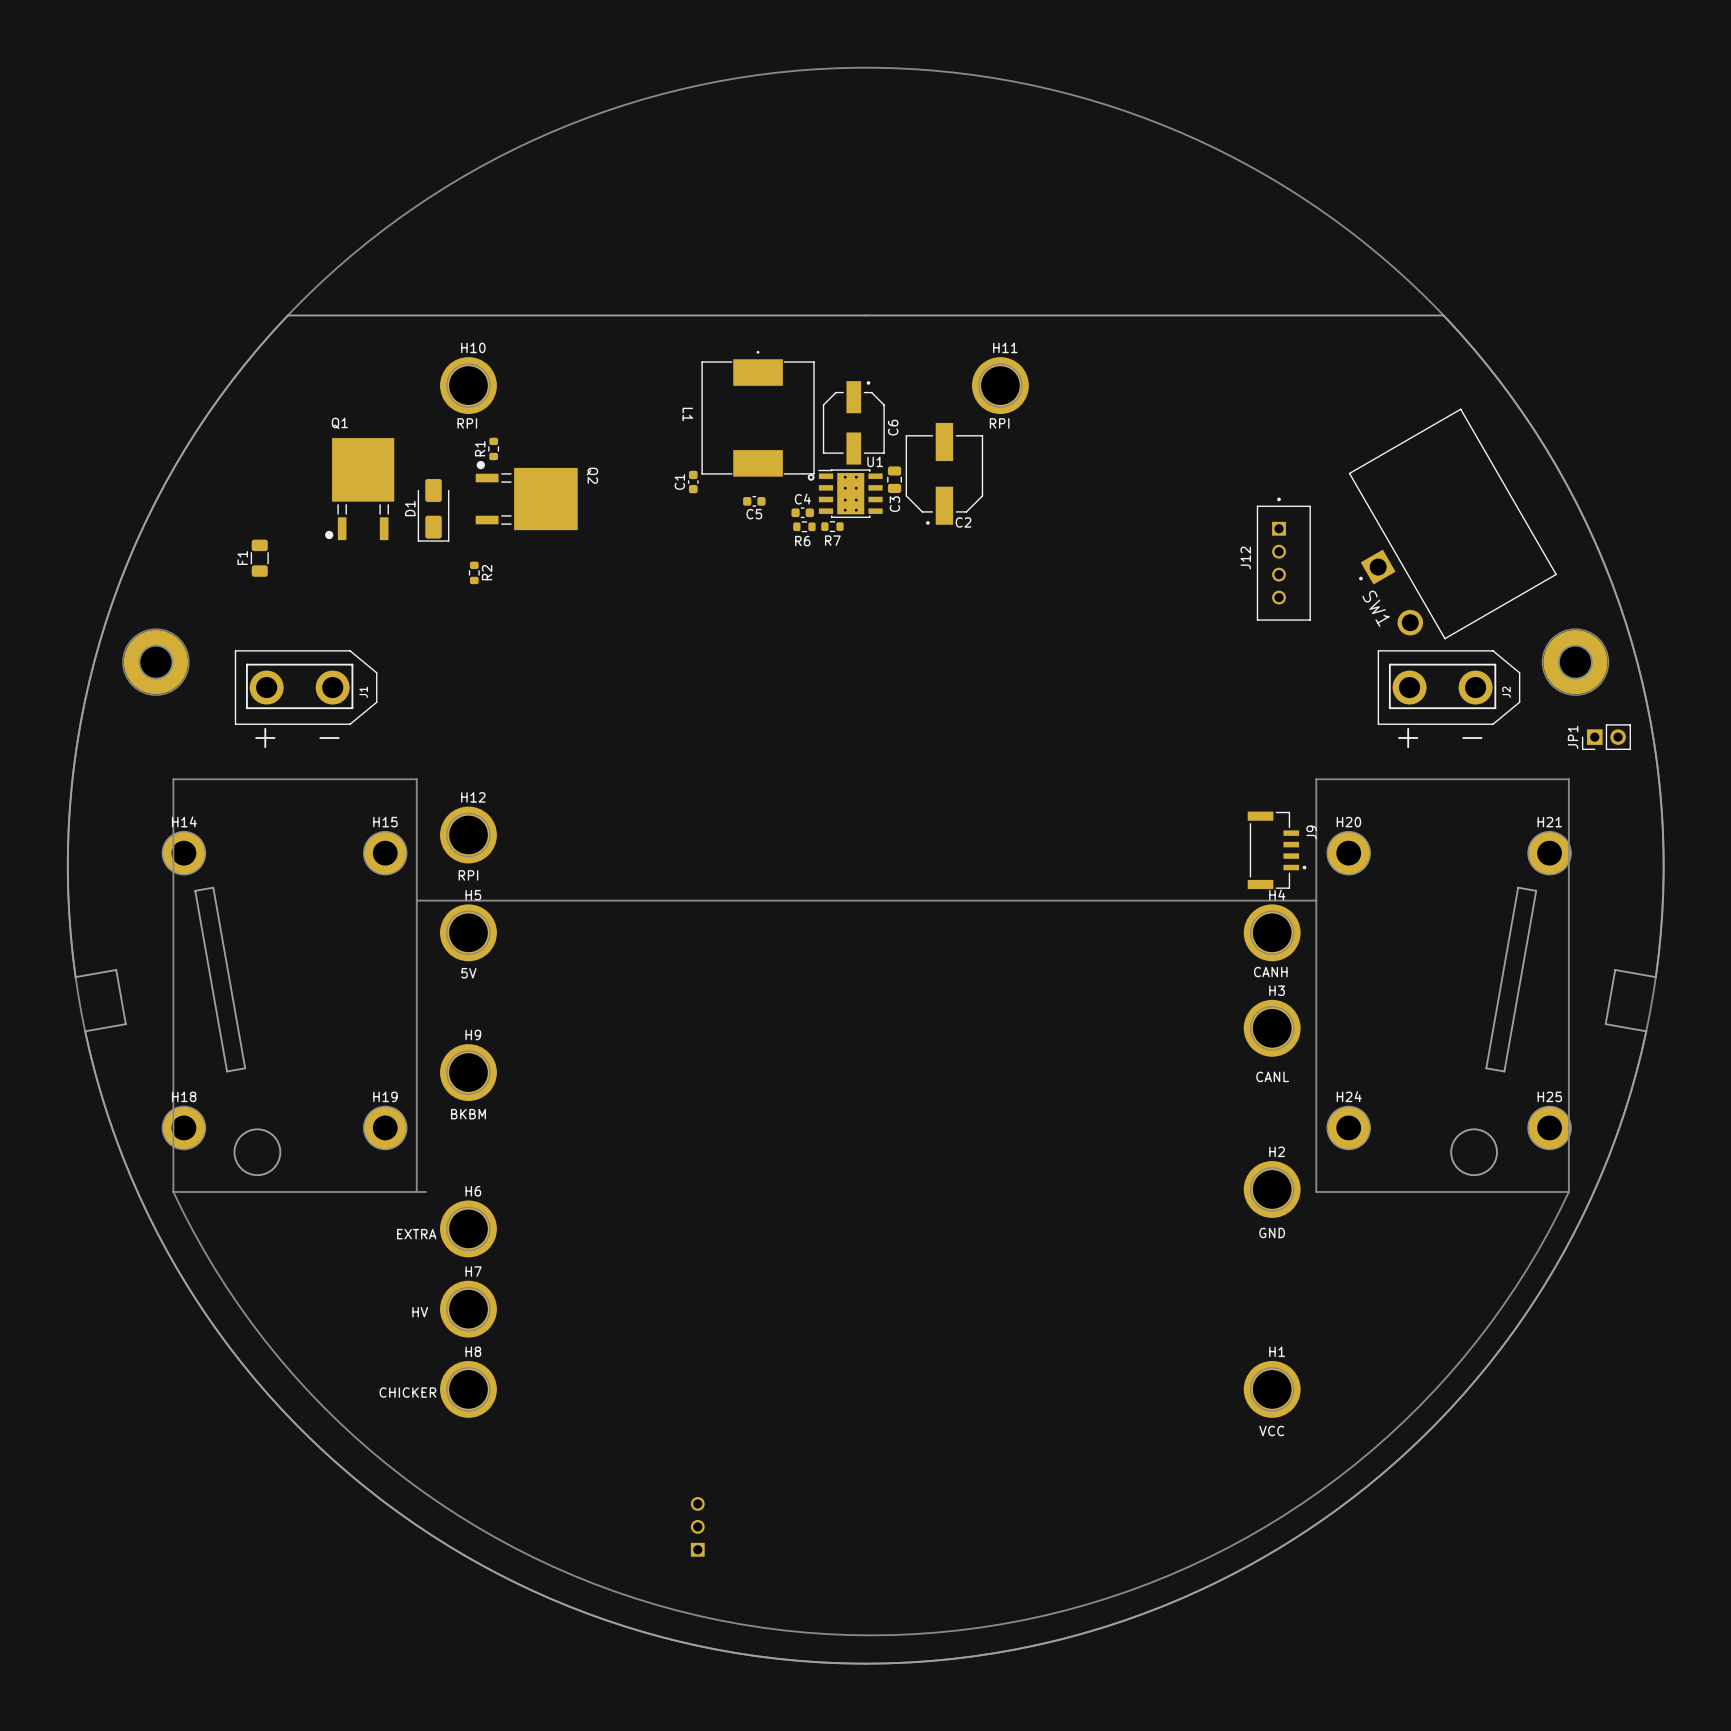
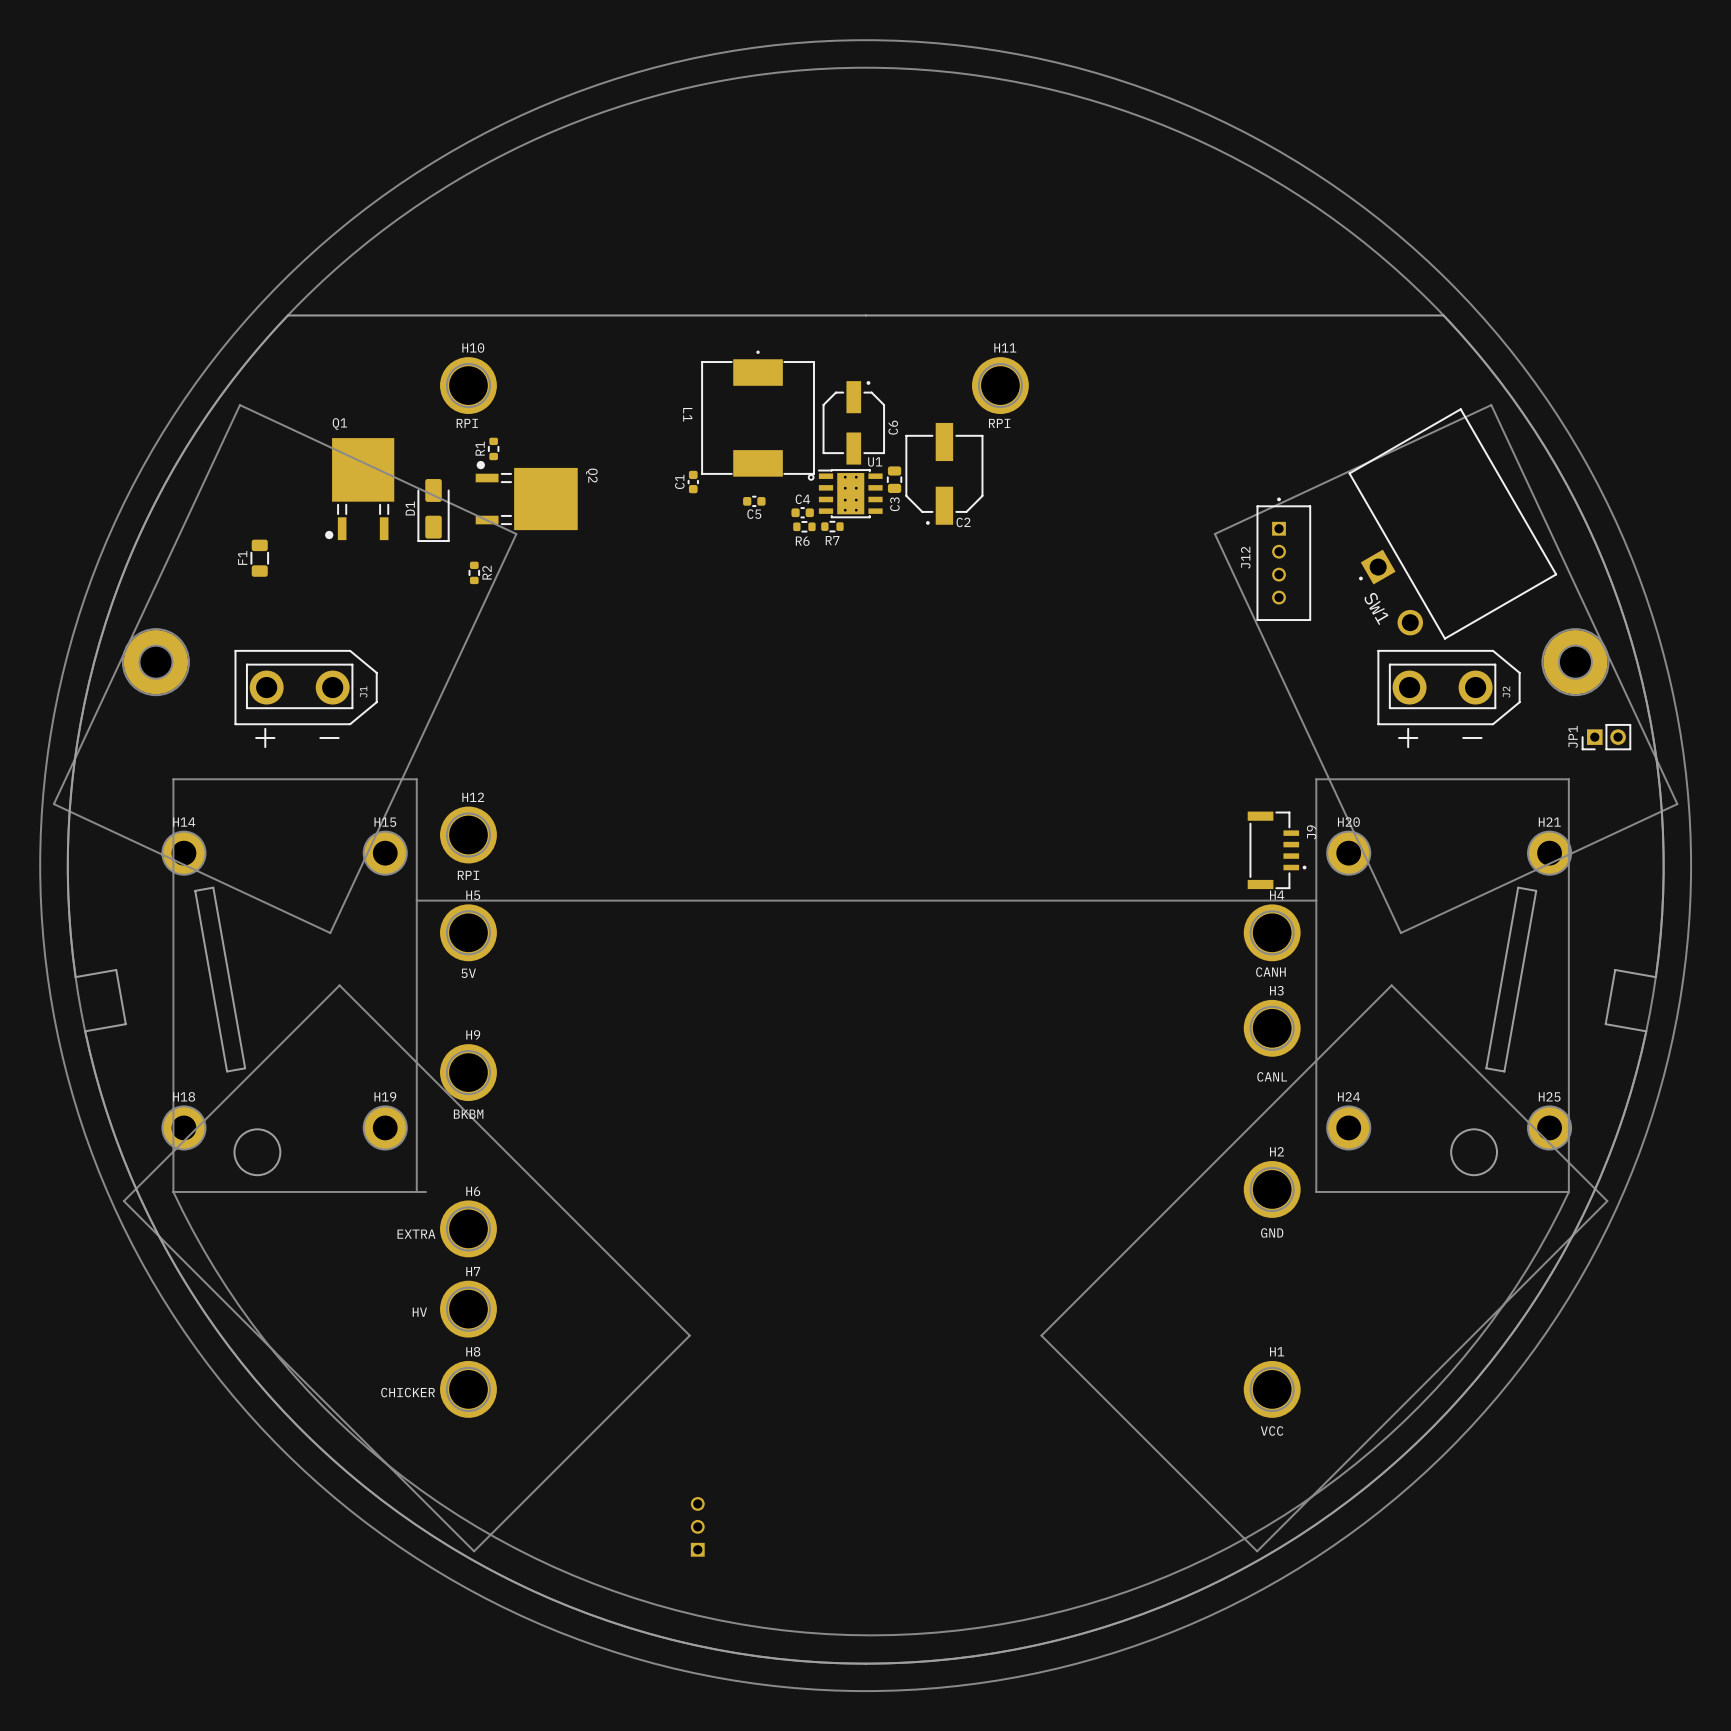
drawing: none -> [39, 39, 1693, 1693]
line: none -> (239, 405) (53, 804) (330, 933) (516, 534) (239, 405)
line: none -> (1491, 405) (1214, 534) (1400, 933) (1677, 804) (1491, 405)
line: none -> (339, 985) (123, 1201) (474, 1551) (689, 1335) (339, 985)
line: none -> (1391, 985) (1607, 1201) (1257, 1551) (1041, 1335) (1391, 985)

